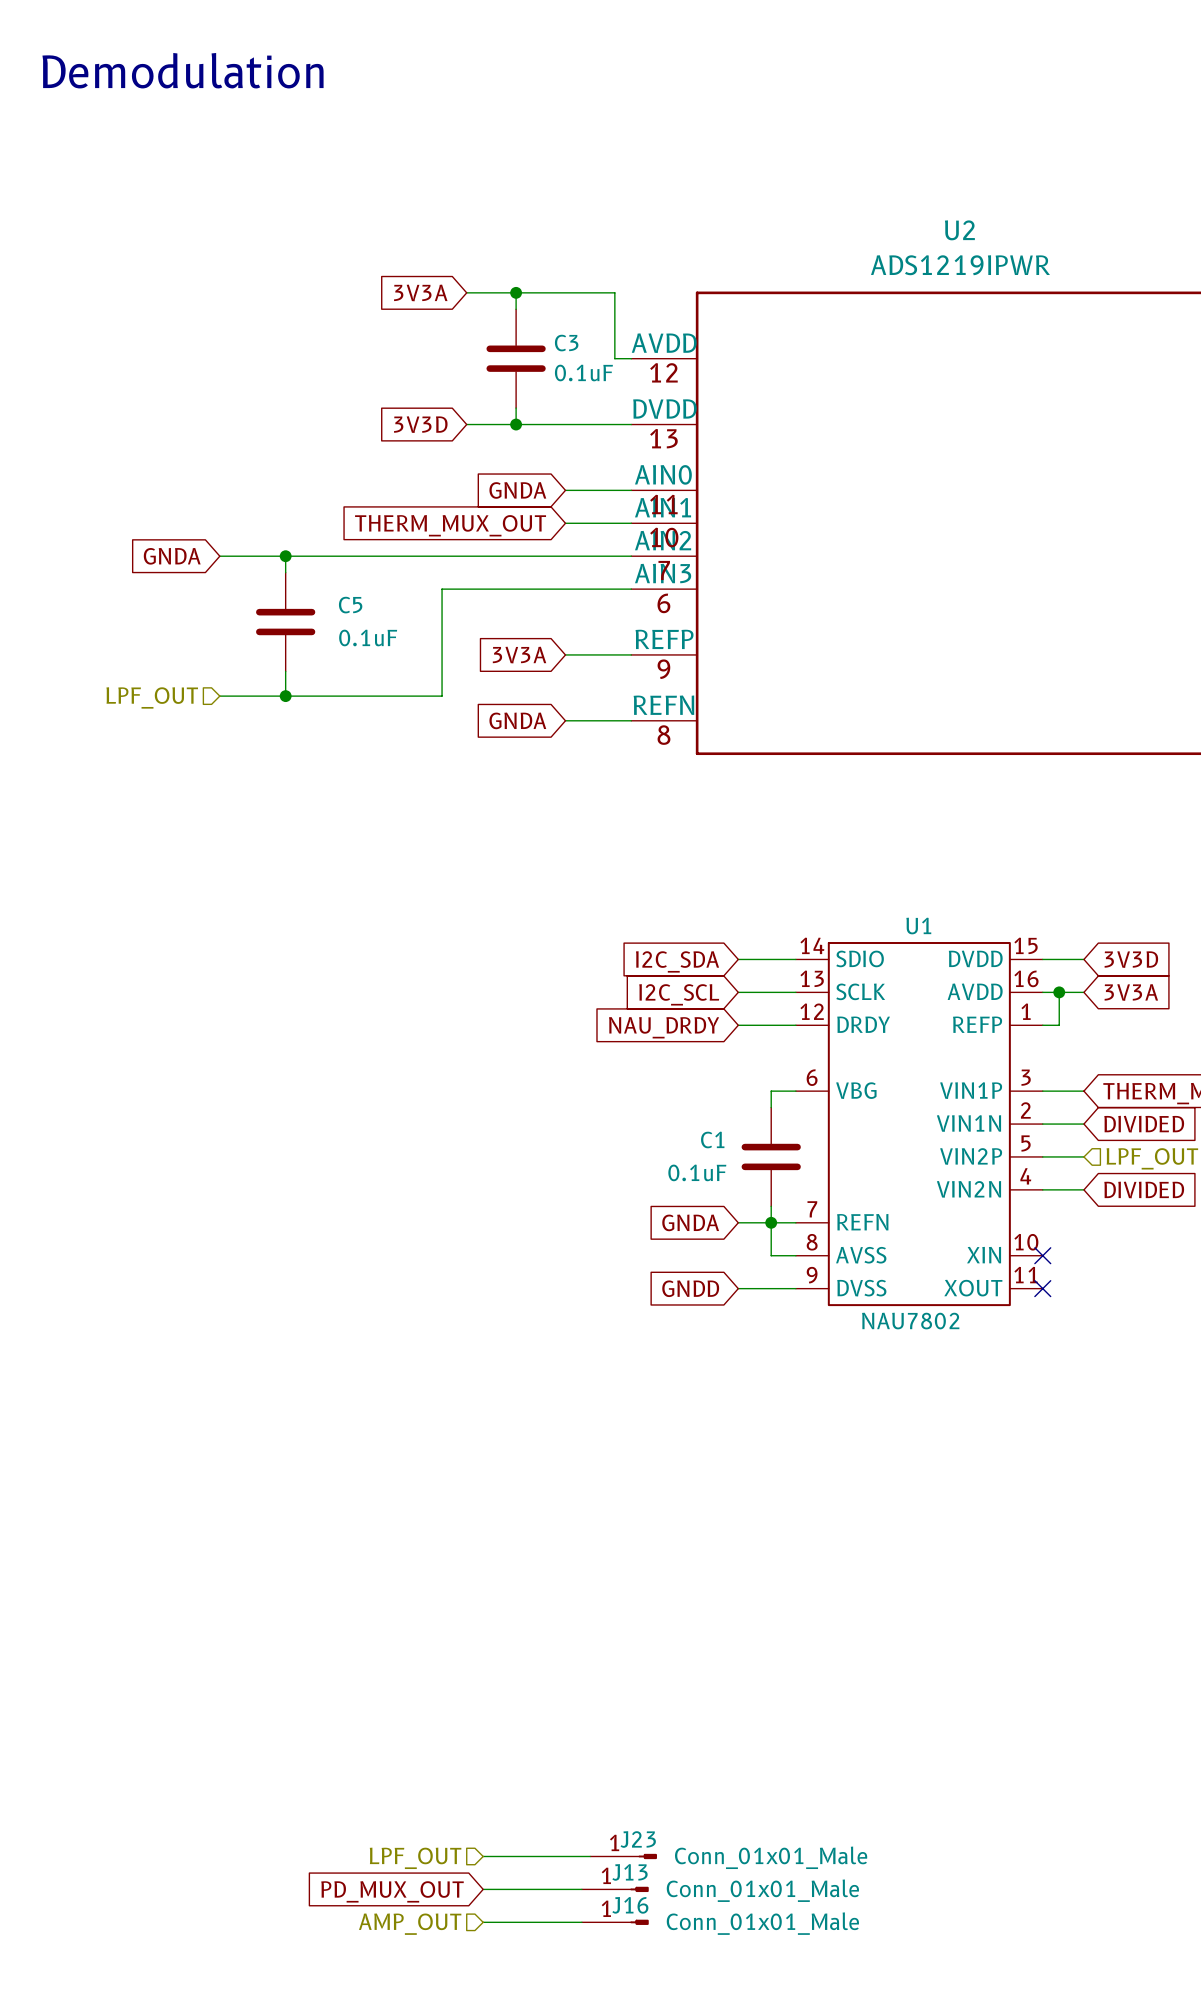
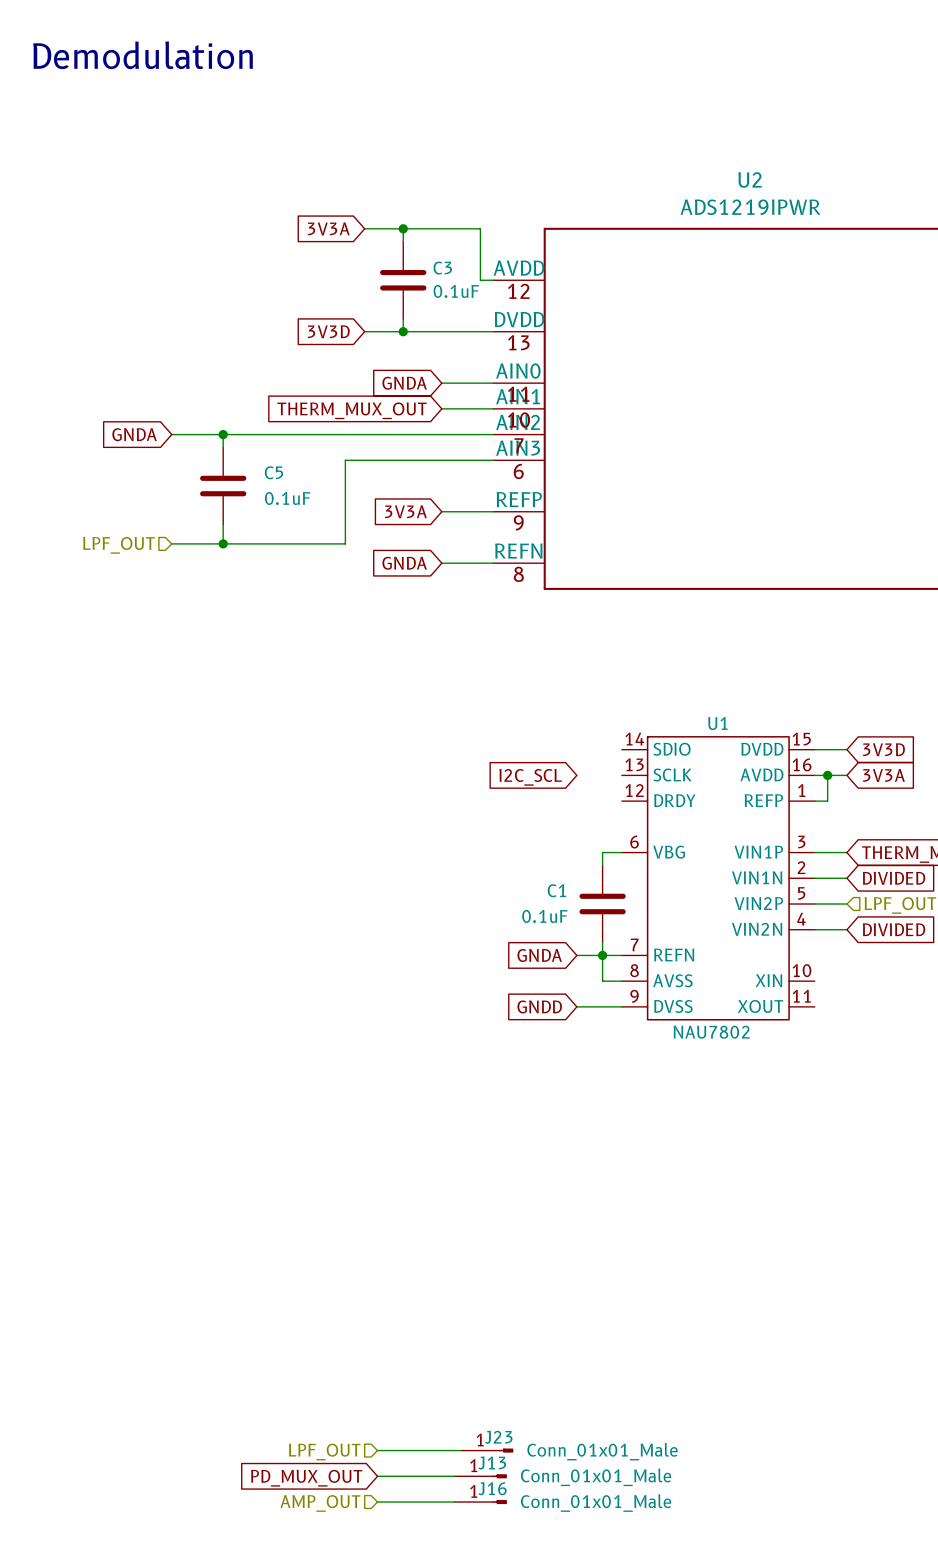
wire: (738, 959) (795, 959) -> none
global label: I2C_SDA (677, 961) -> none
wire: (738, 992) (795, 992) -> none
wire: (738, 1025) (795, 1025) -> none
global label: NAU_DRDY (664, 1027) -> none
no-connect mark: (1042, 1255) -> none
no-connect mark: (1042, 1288) -> none

